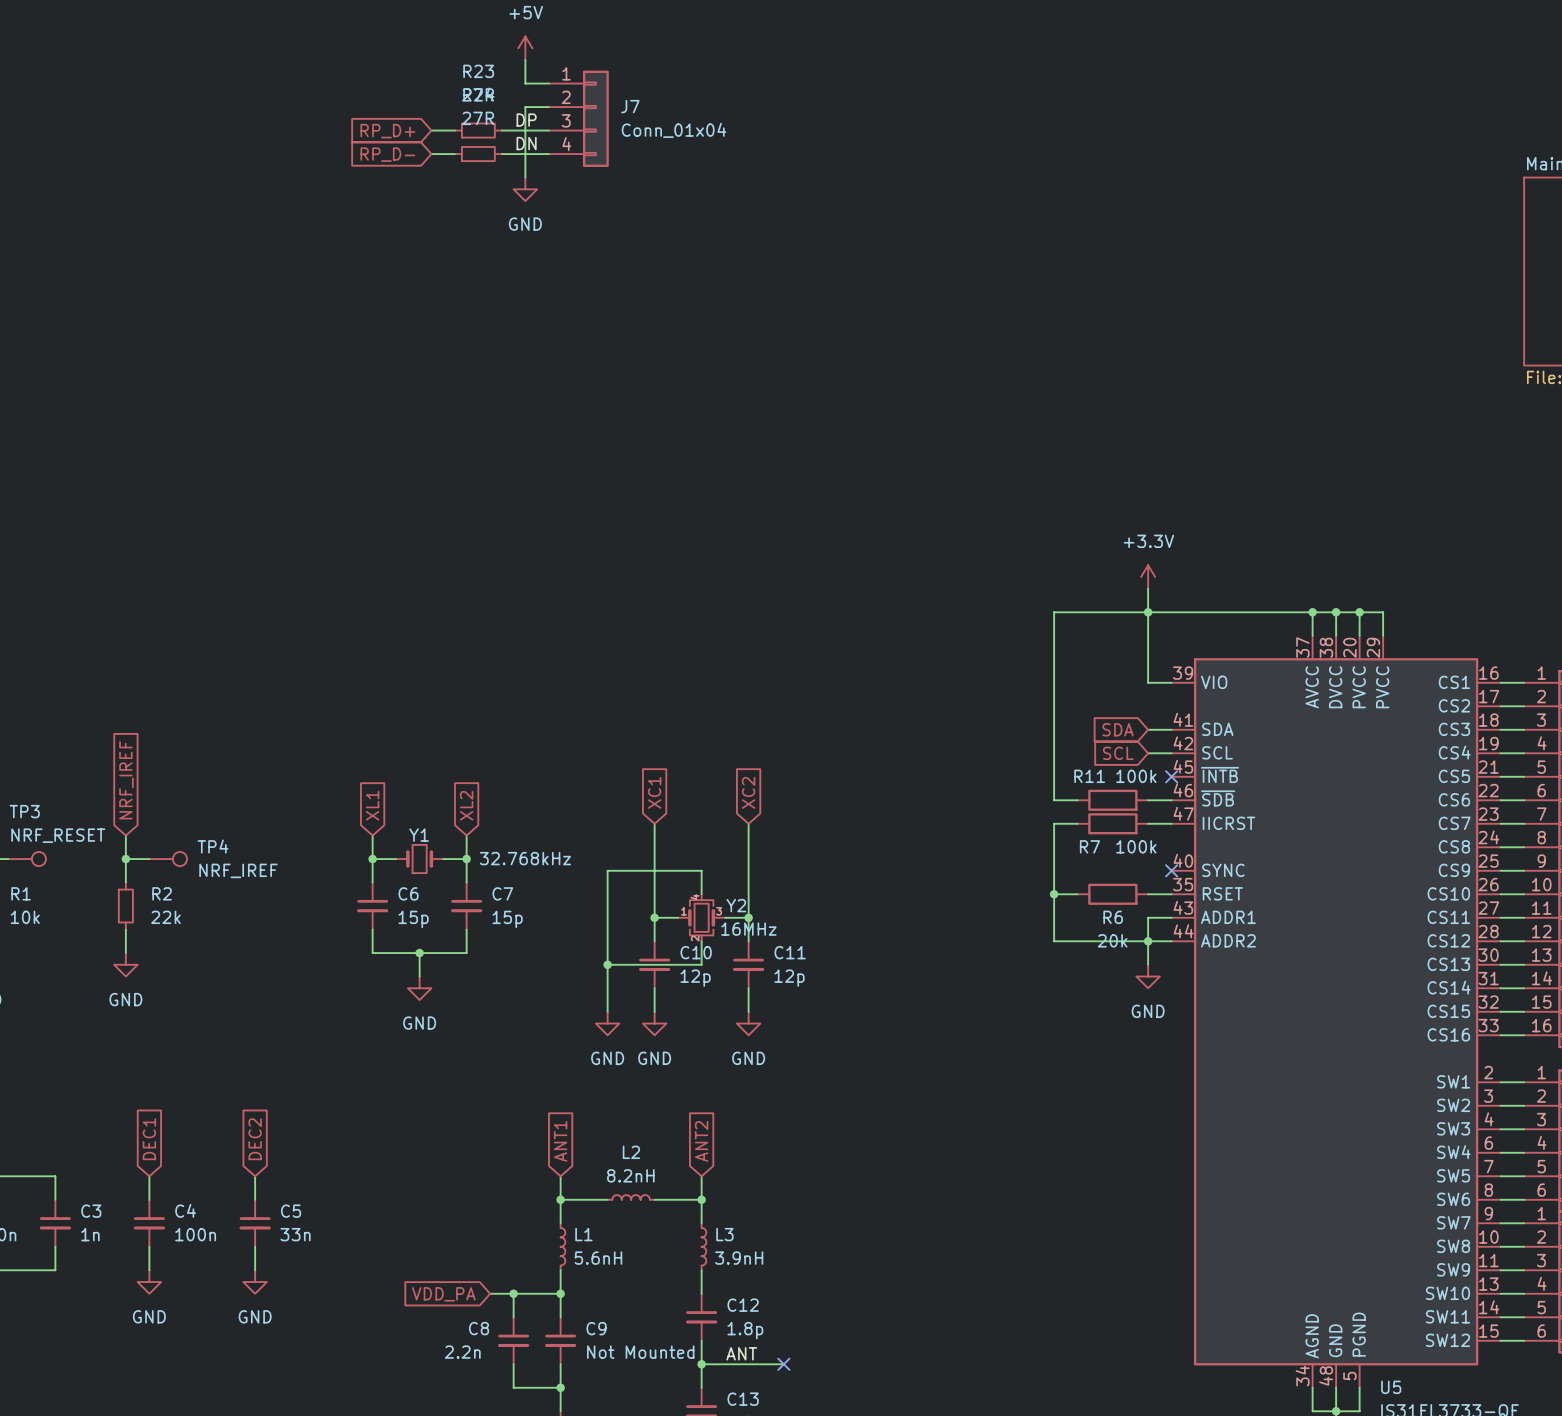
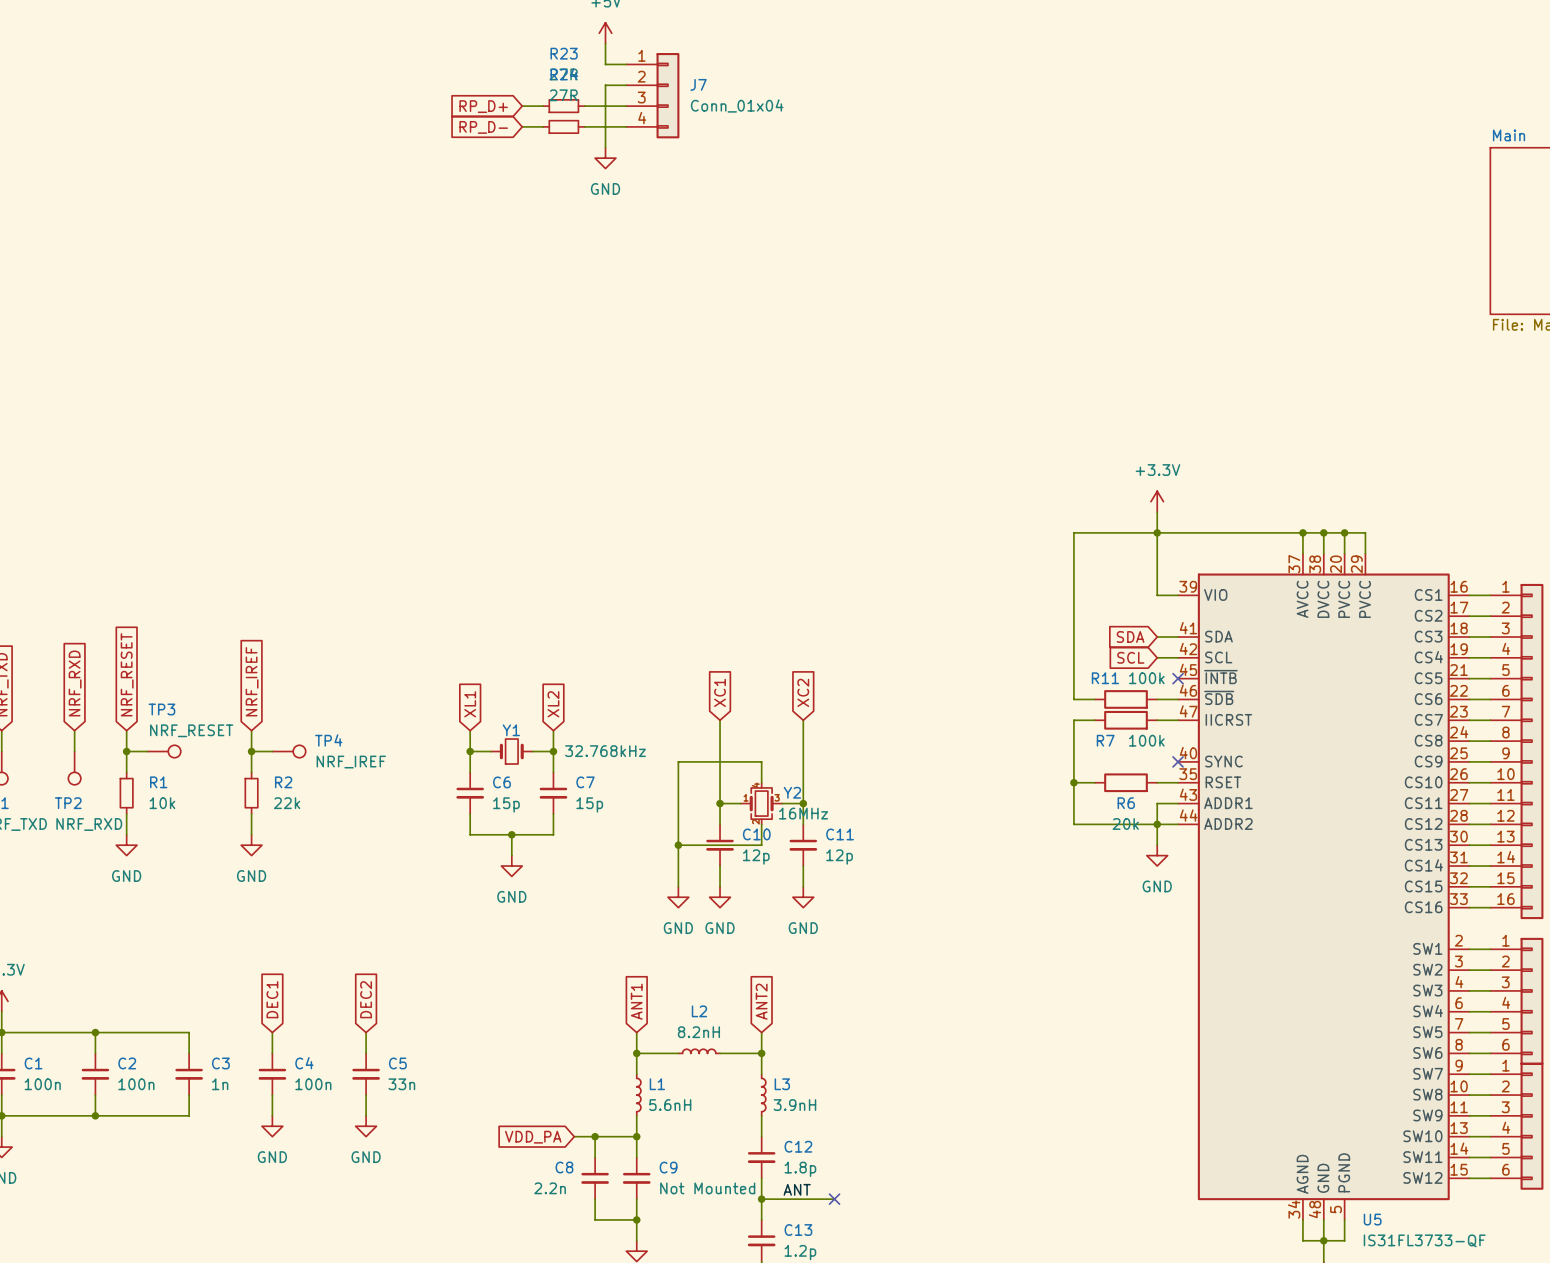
label: DP (526, 120) -> none
label: DN (526, 143) -> none

